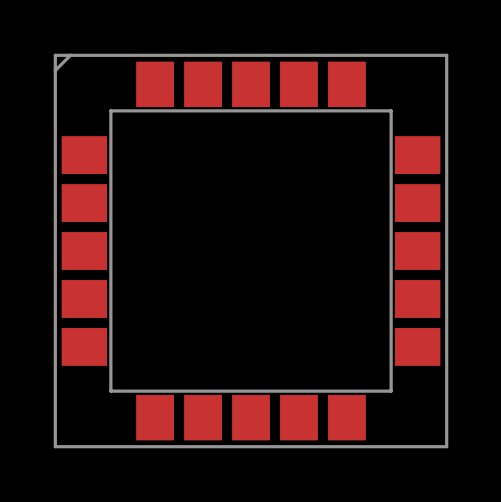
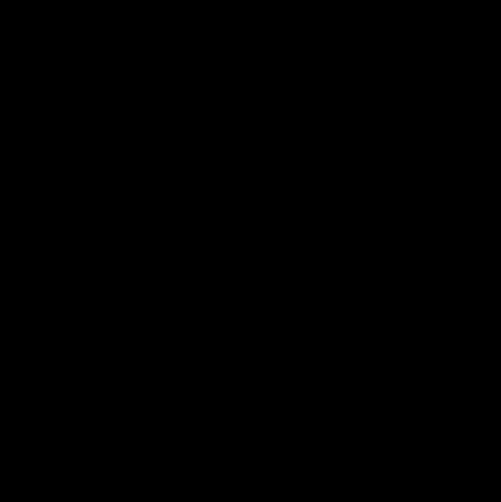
part: (251, 251) -> none

